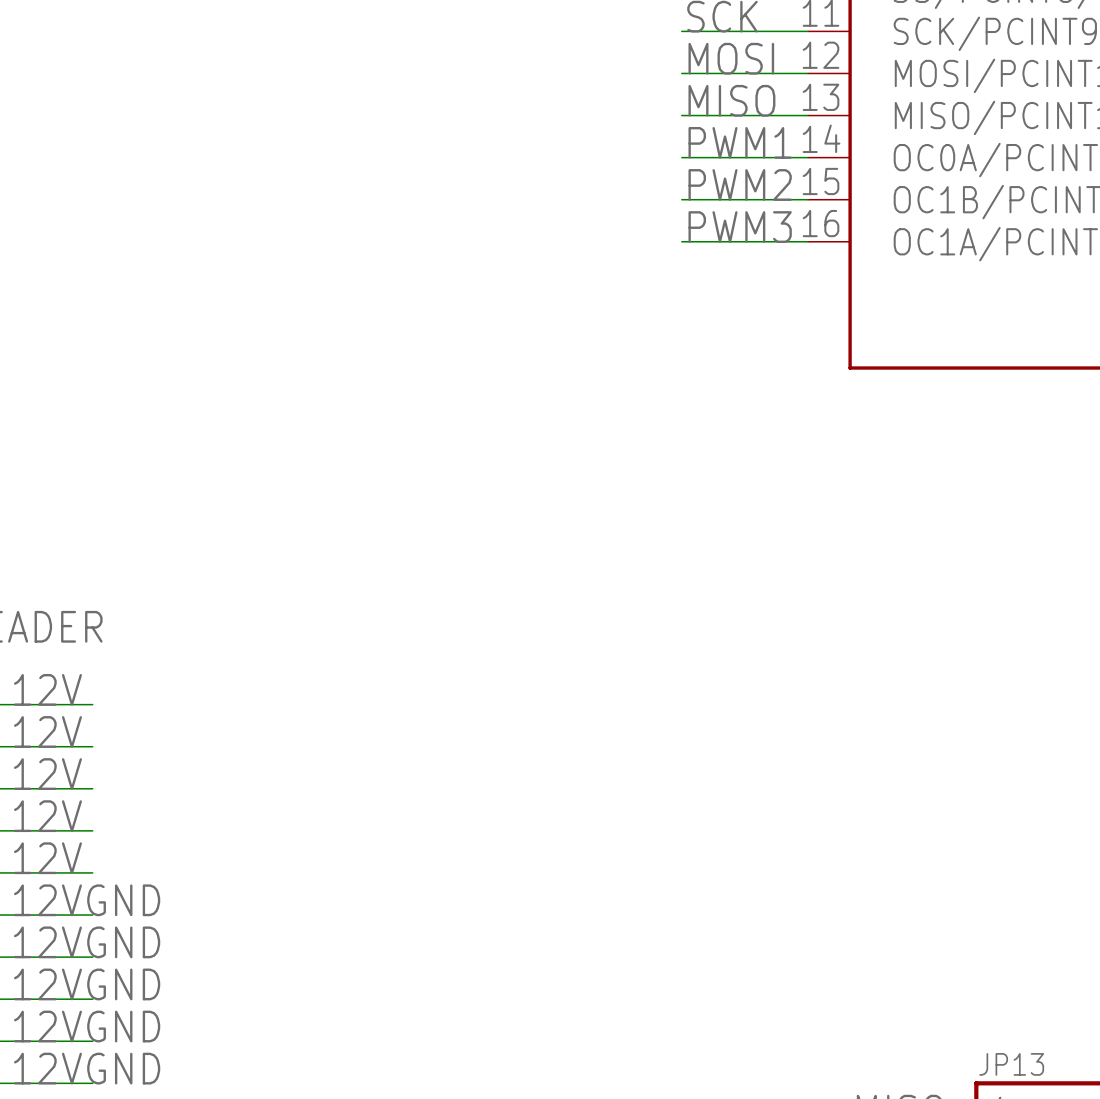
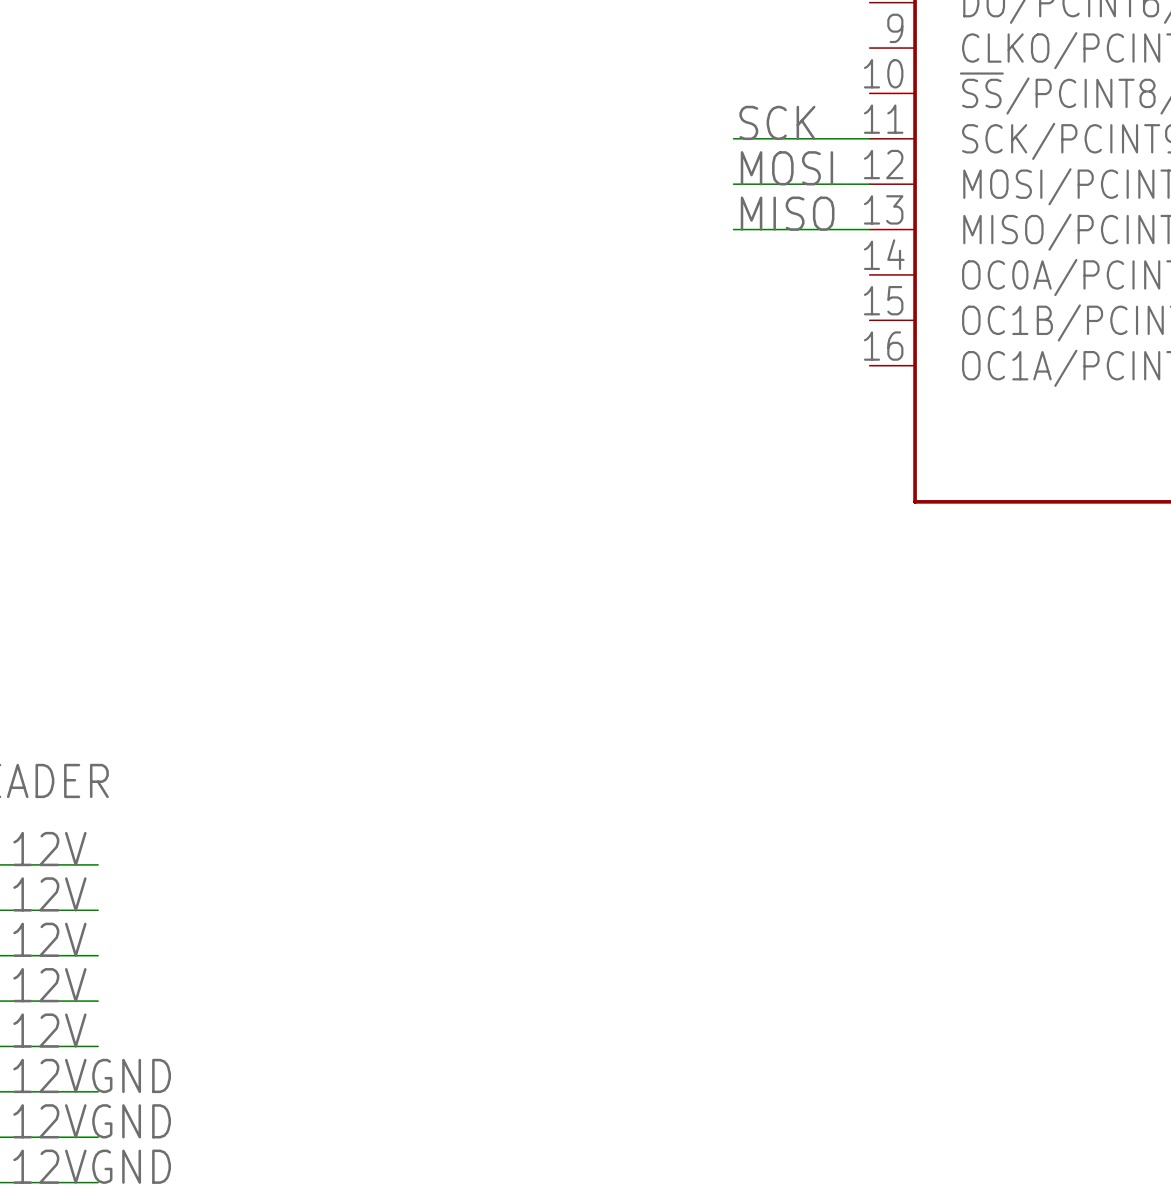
label: PWM1 (740, 142) -> none
wire: (681, 157) (808, 157) -> none
label: PWM2 (740, 184) -> none
wire: (681, 199) (808, 199) -> none
label: PWM3 (740, 227) -> none
wire: (681, 241) (808, 241) -> none

